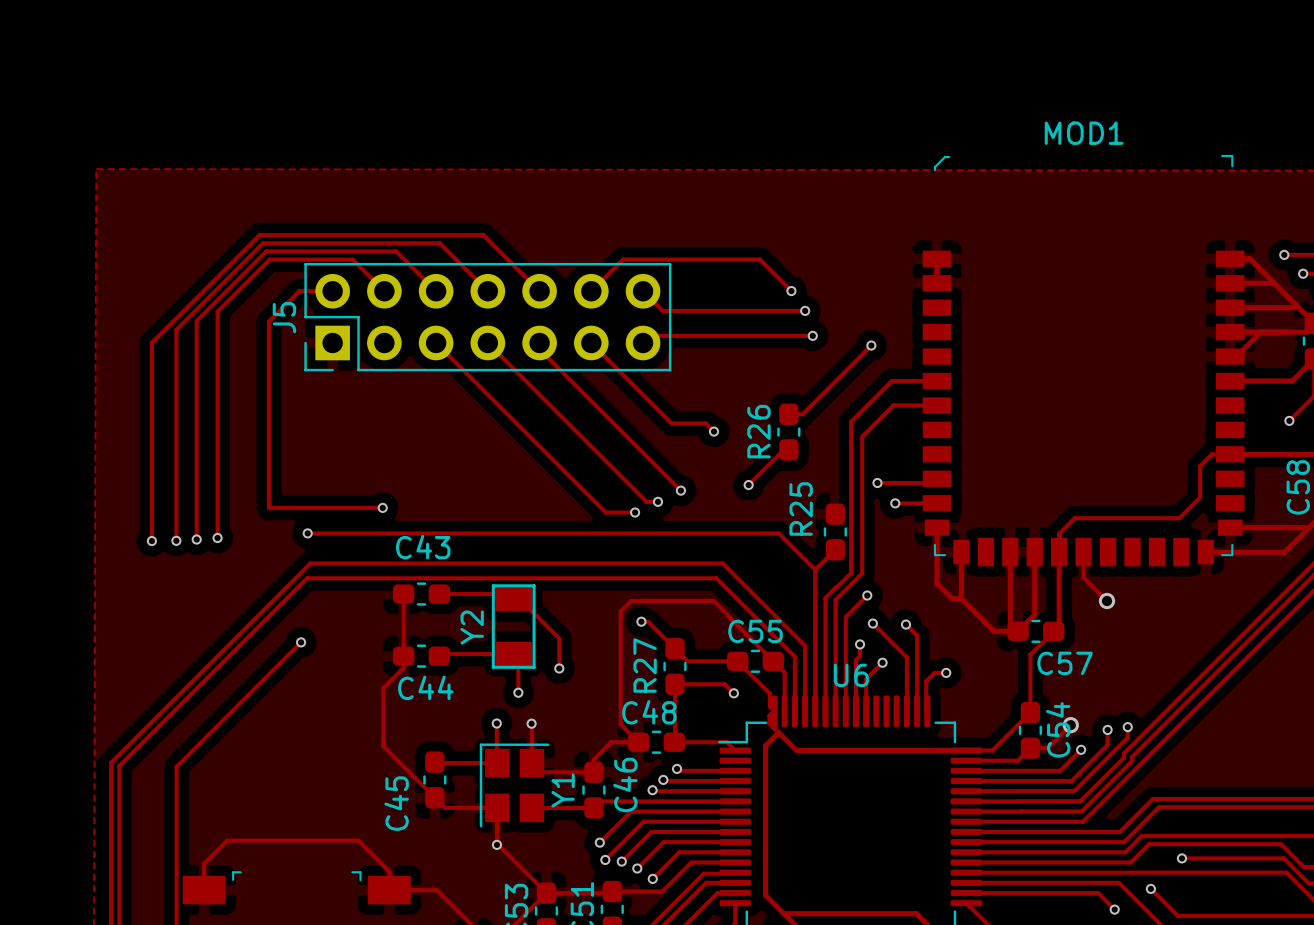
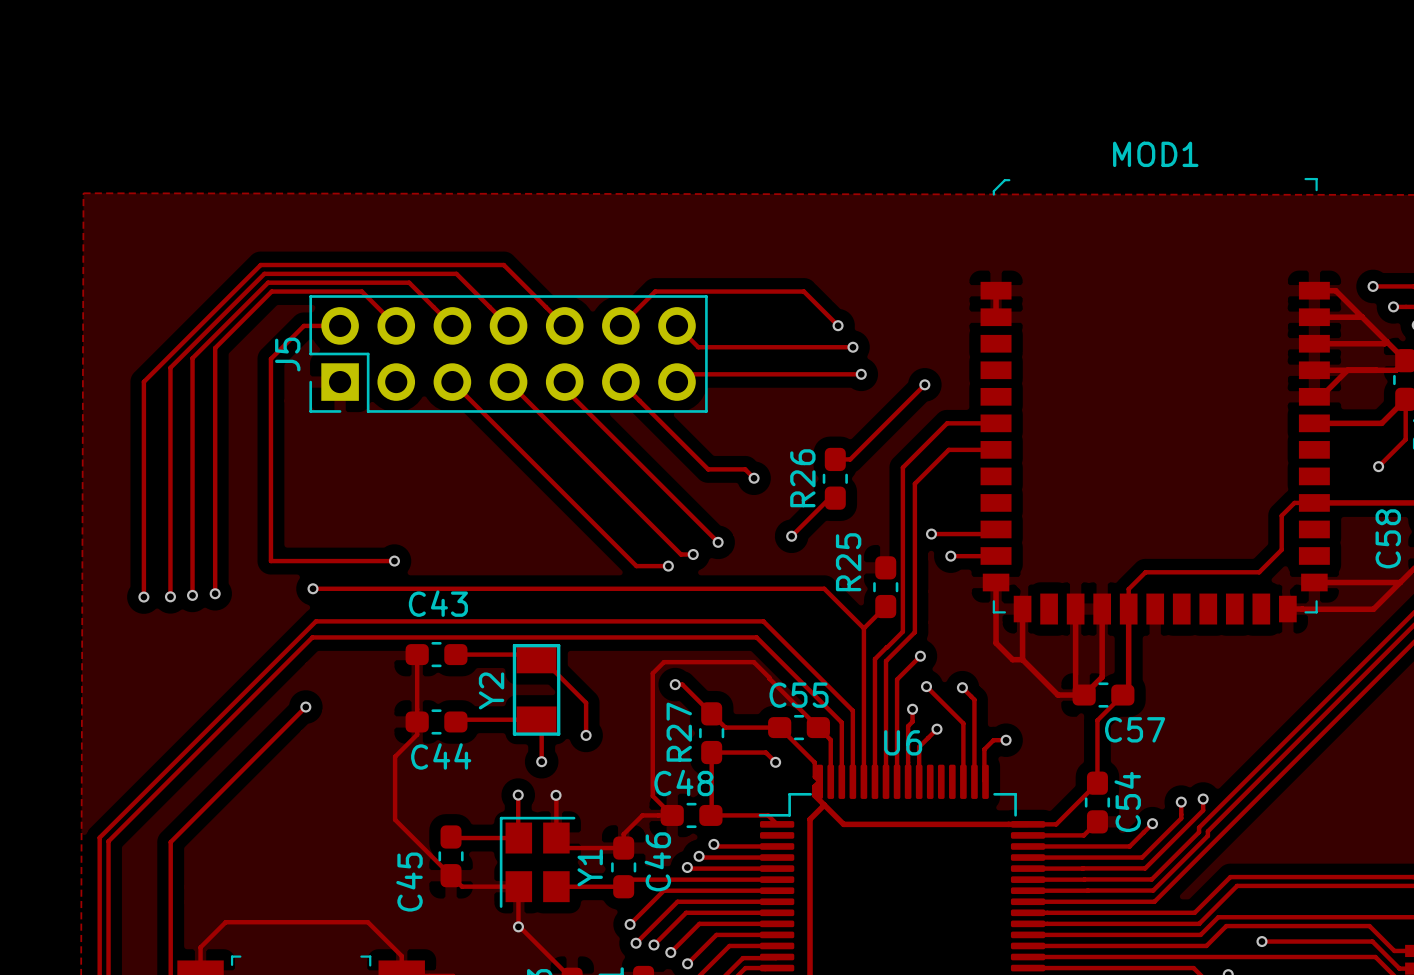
track: (1083, 552) (1083, 577) (1107, 601) -> none
via: (1107, 601) -> none
track: (1070, 725) (1047, 748) (1030, 748) -> none
via: (1070, 725) -> none

